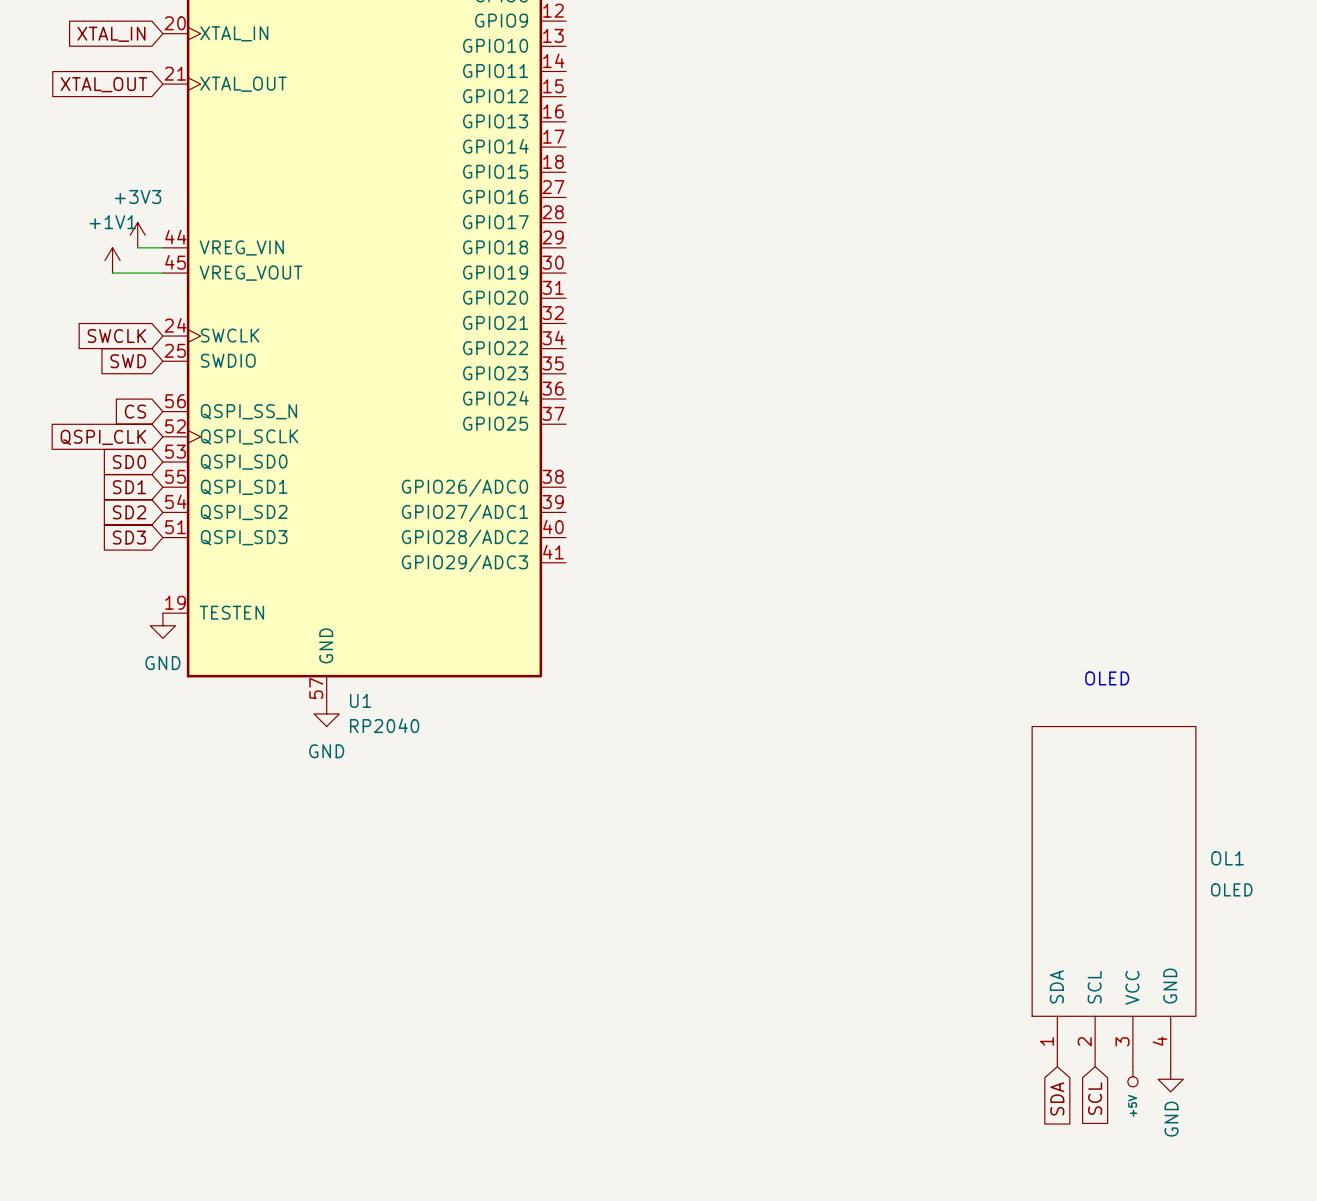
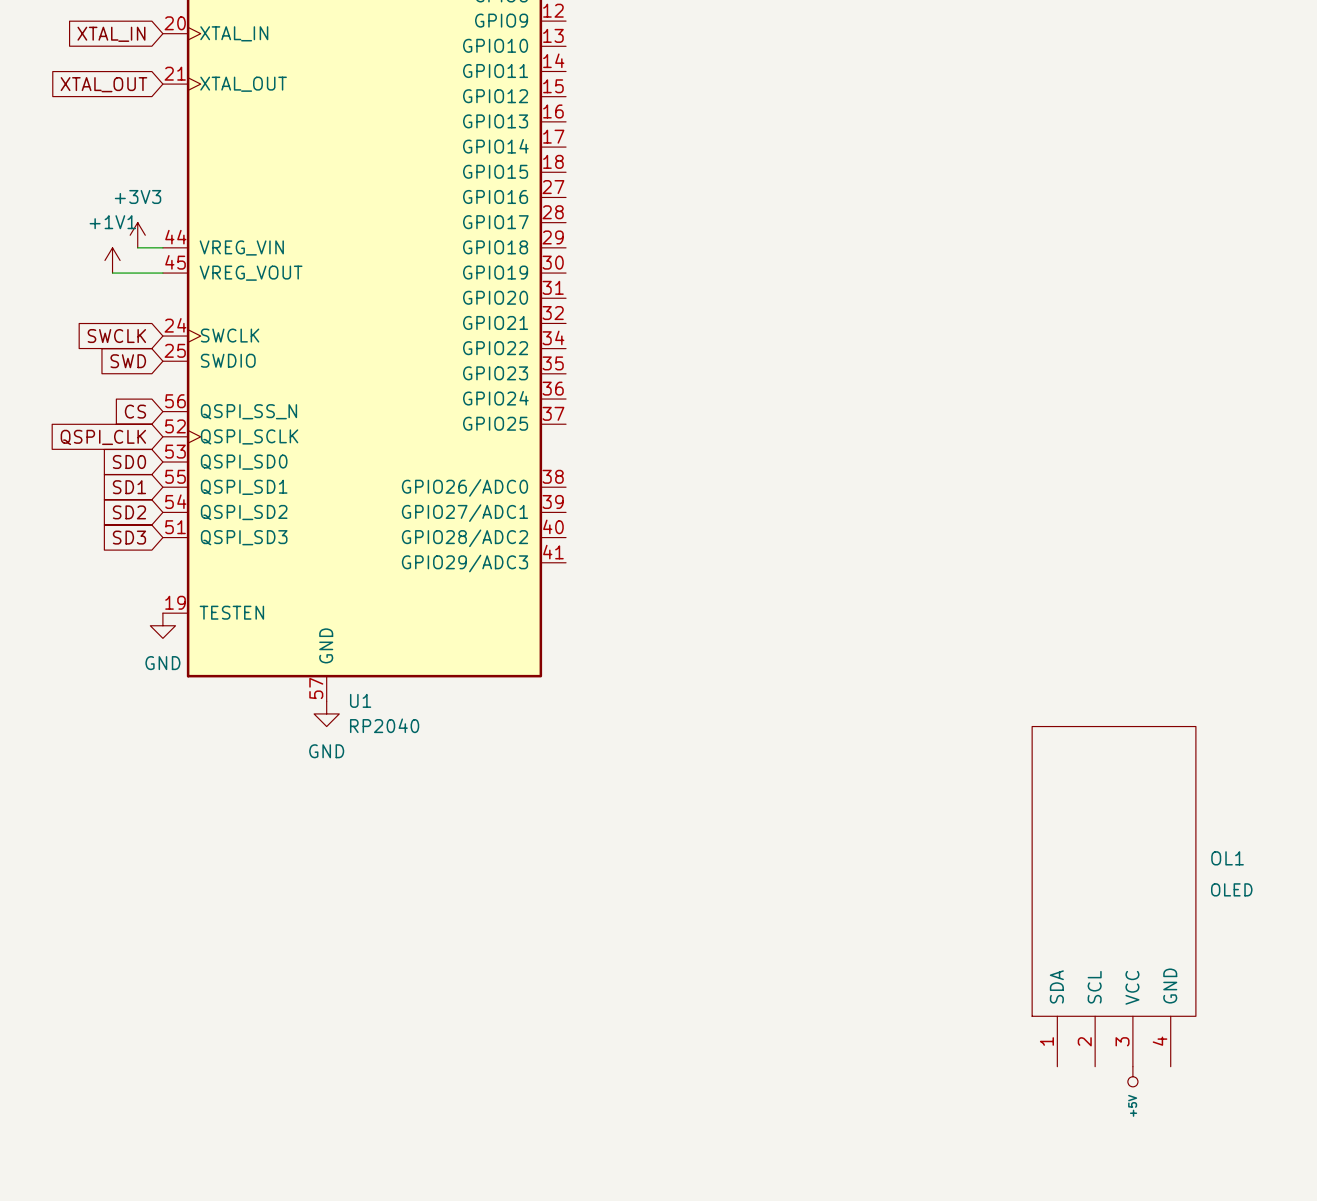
text: OLED (1107, 678) -> none
power symbol: GND (1170, 1079) -> none
global label: SDA (1057, 1098) -> none
global label: SCL (1095, 1098) -> none

